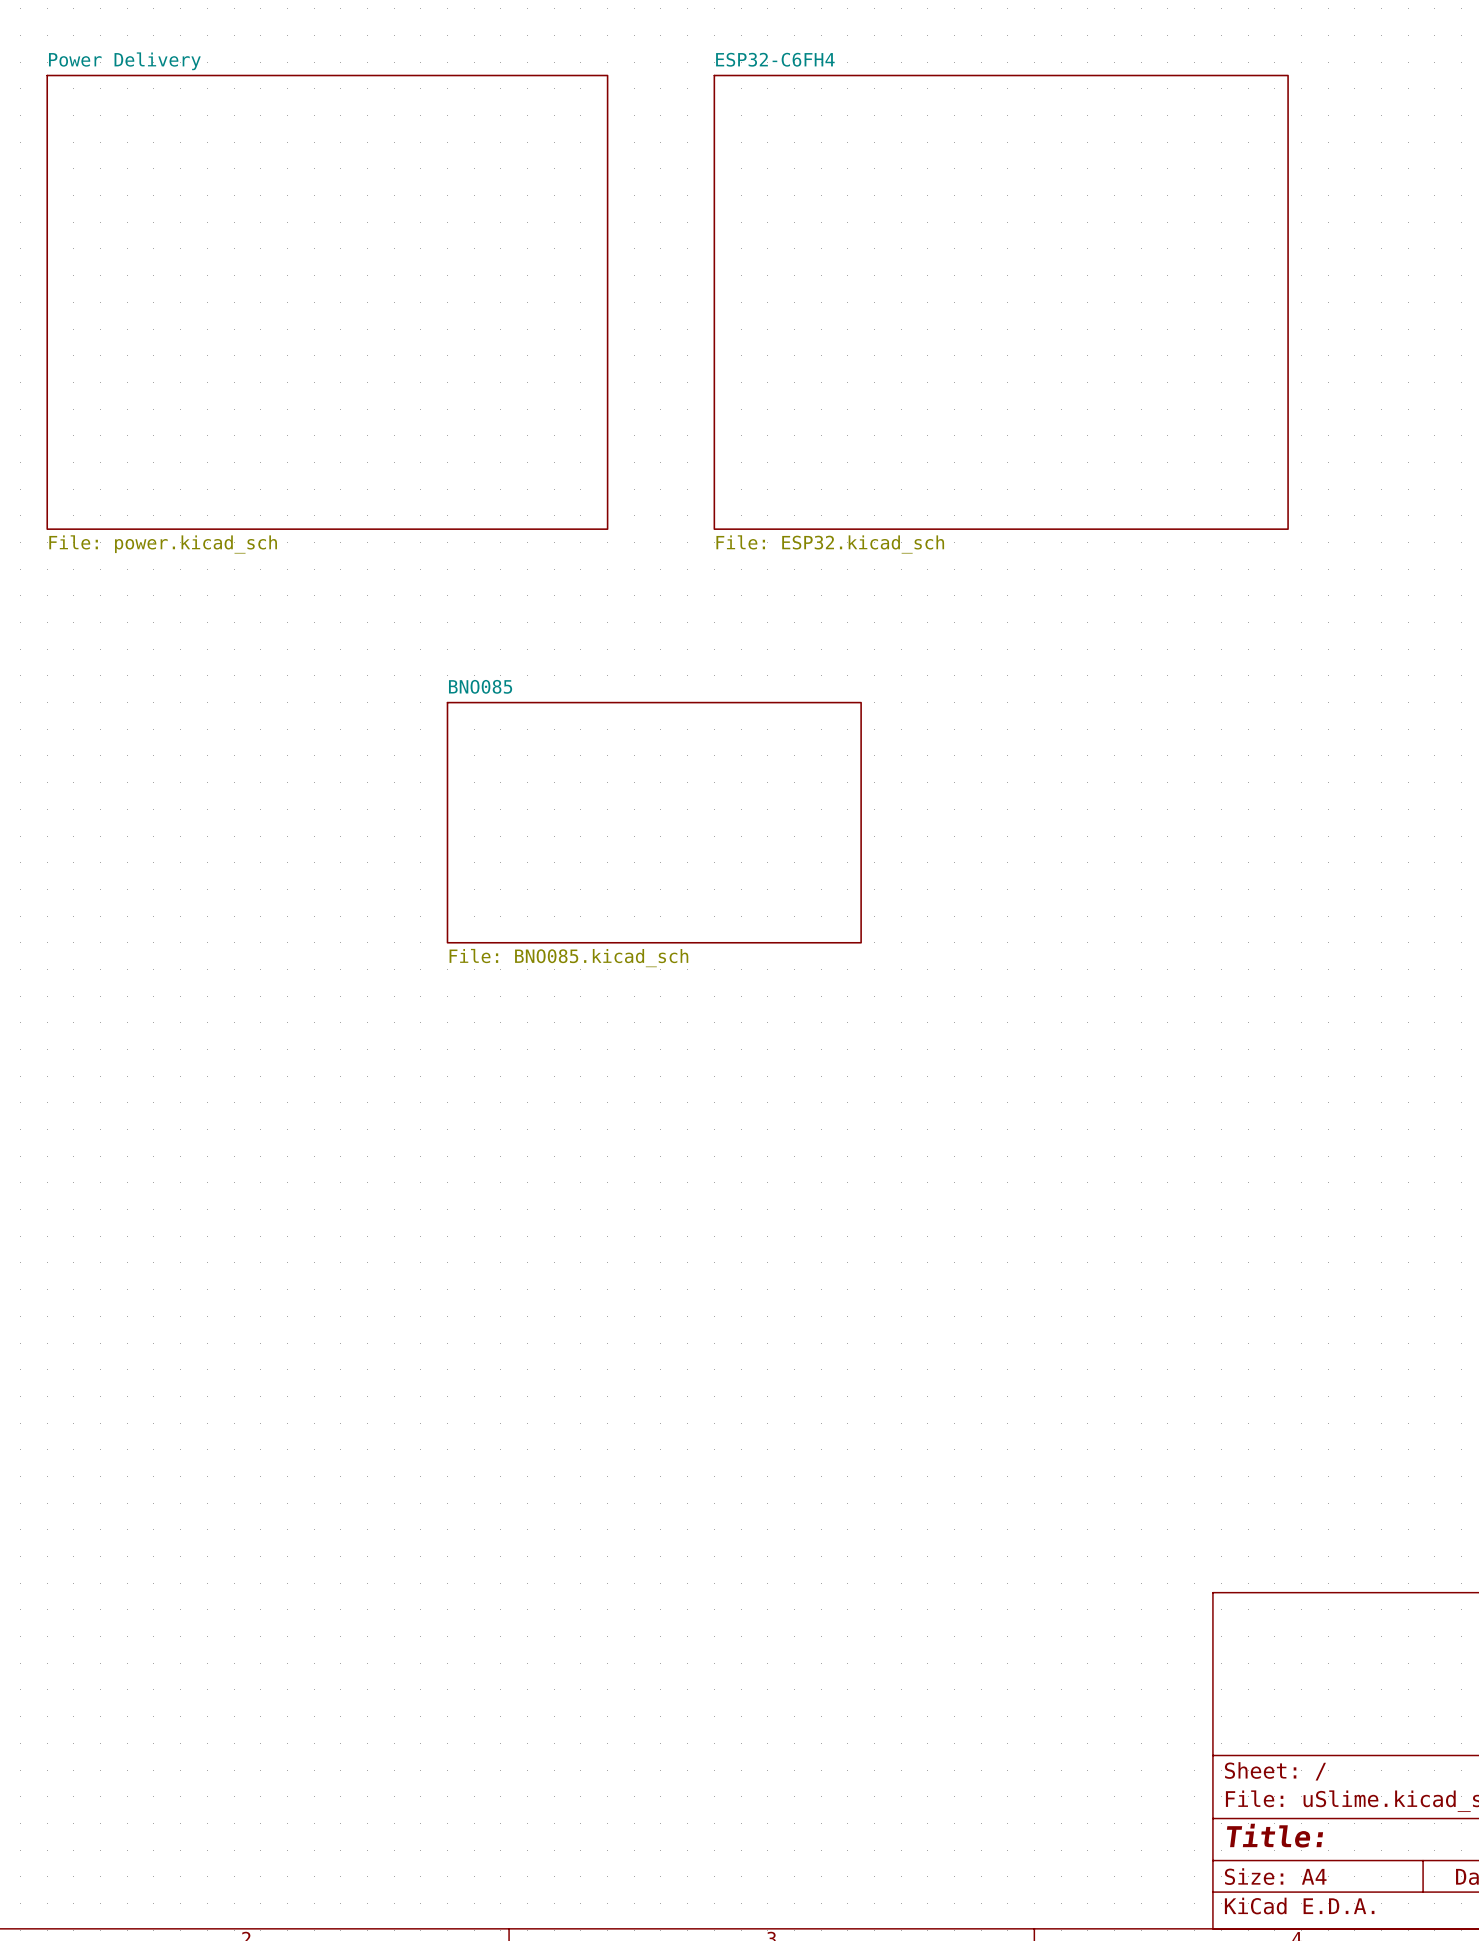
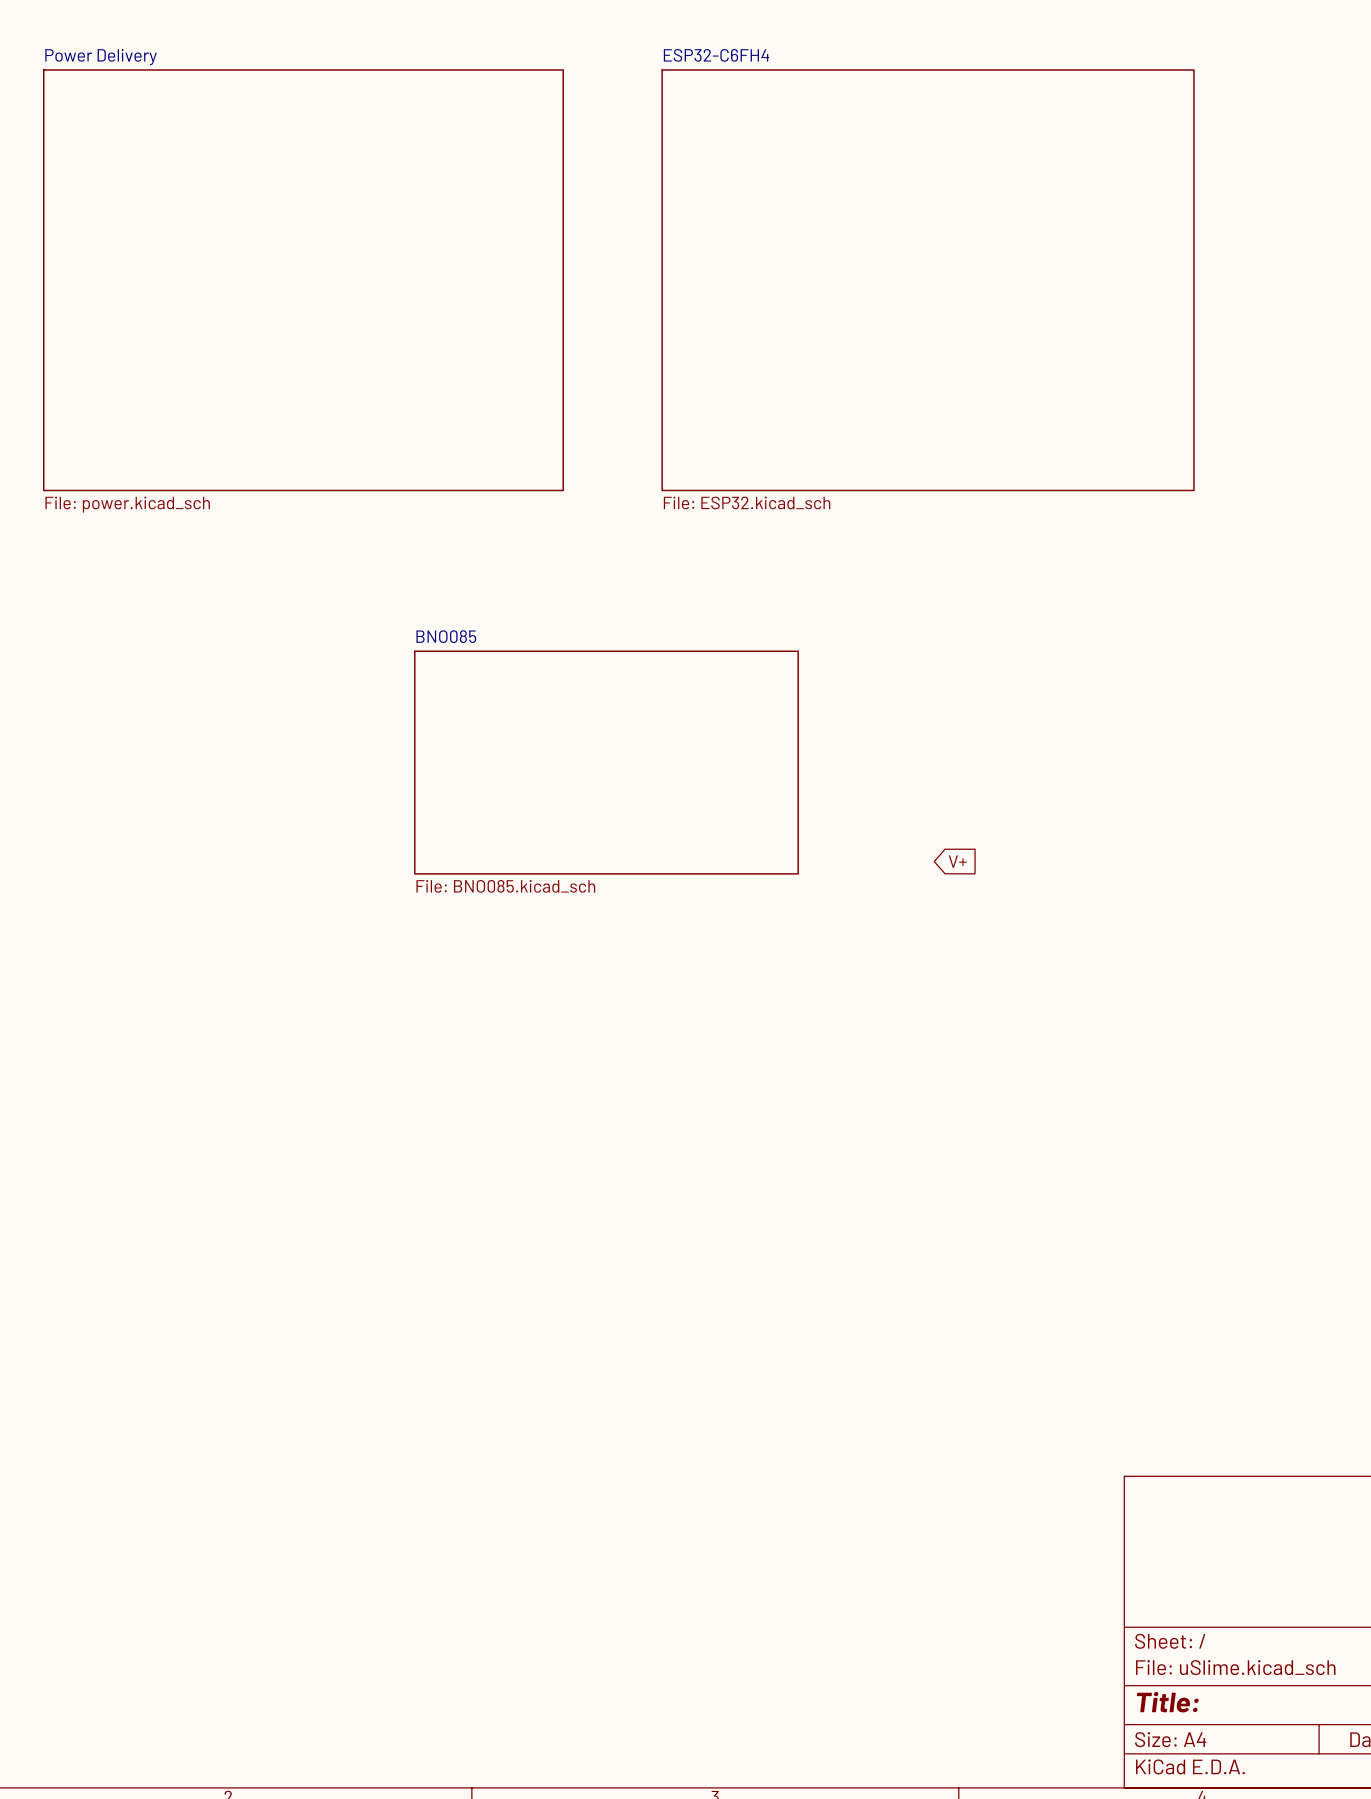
global label: none -> V+ (957, 861)

